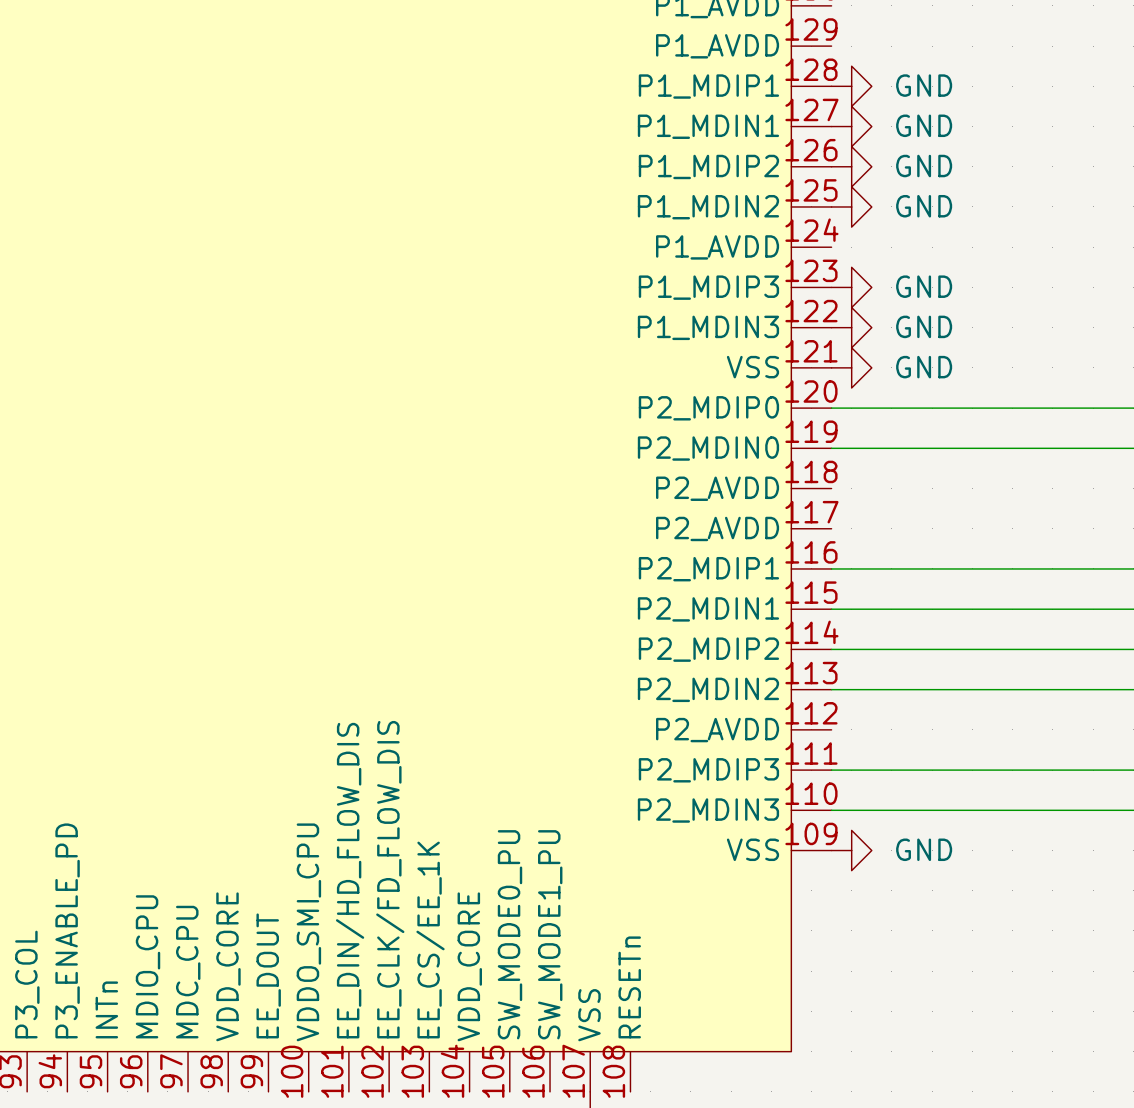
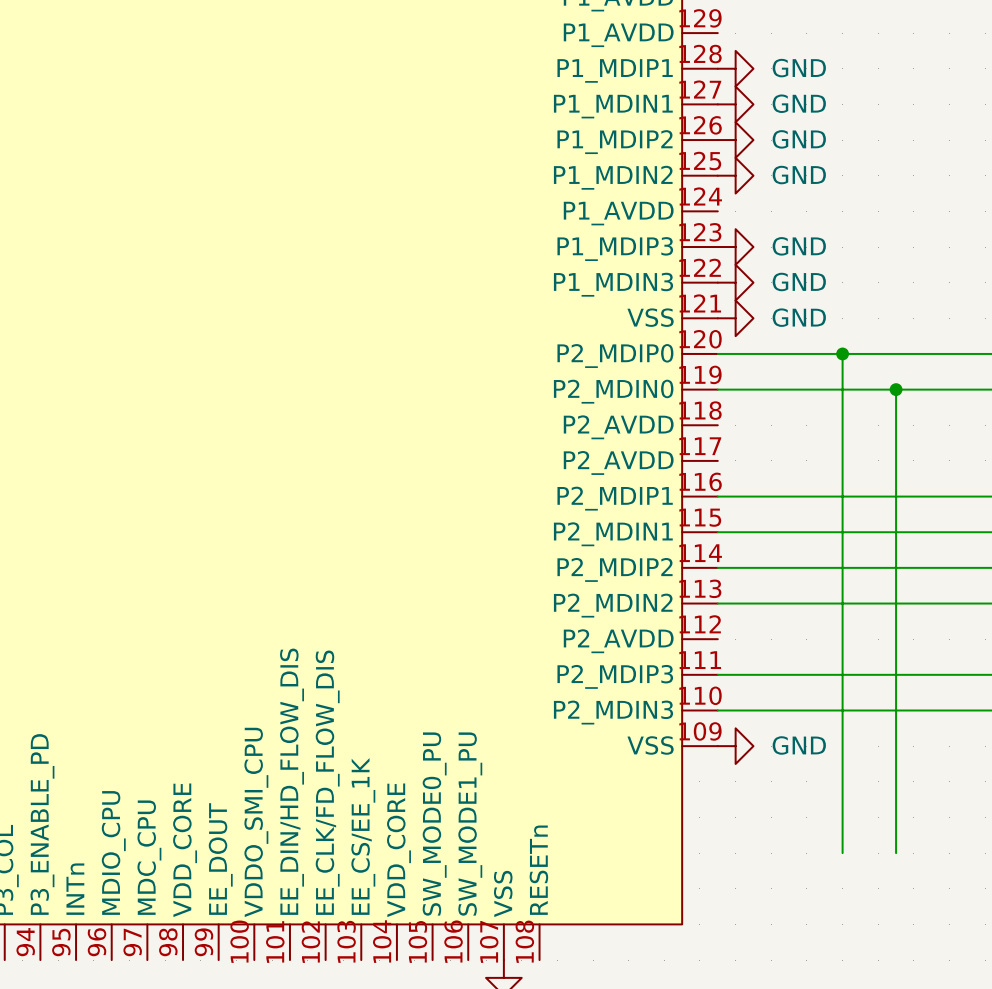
wire: none -> (842, 353) (842, 853)
junction: none -> (842, 353)
wire: none -> (896, 389) (896, 853)
junction: none -> (896, 389)

